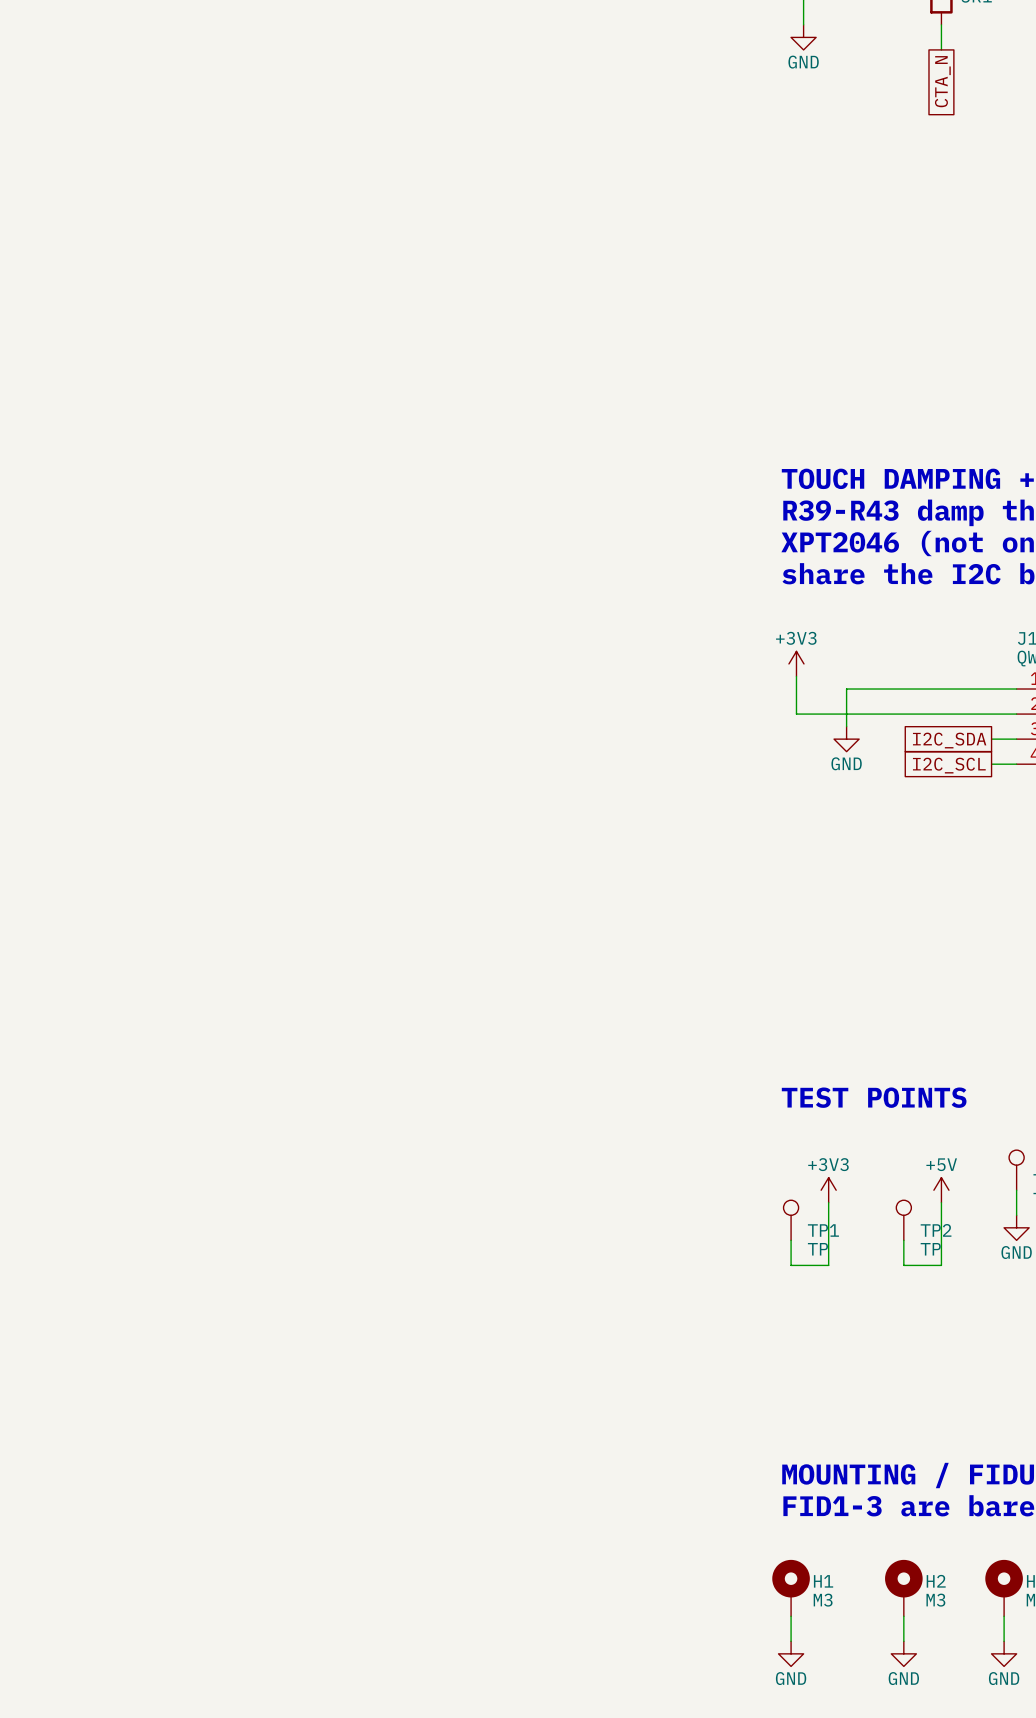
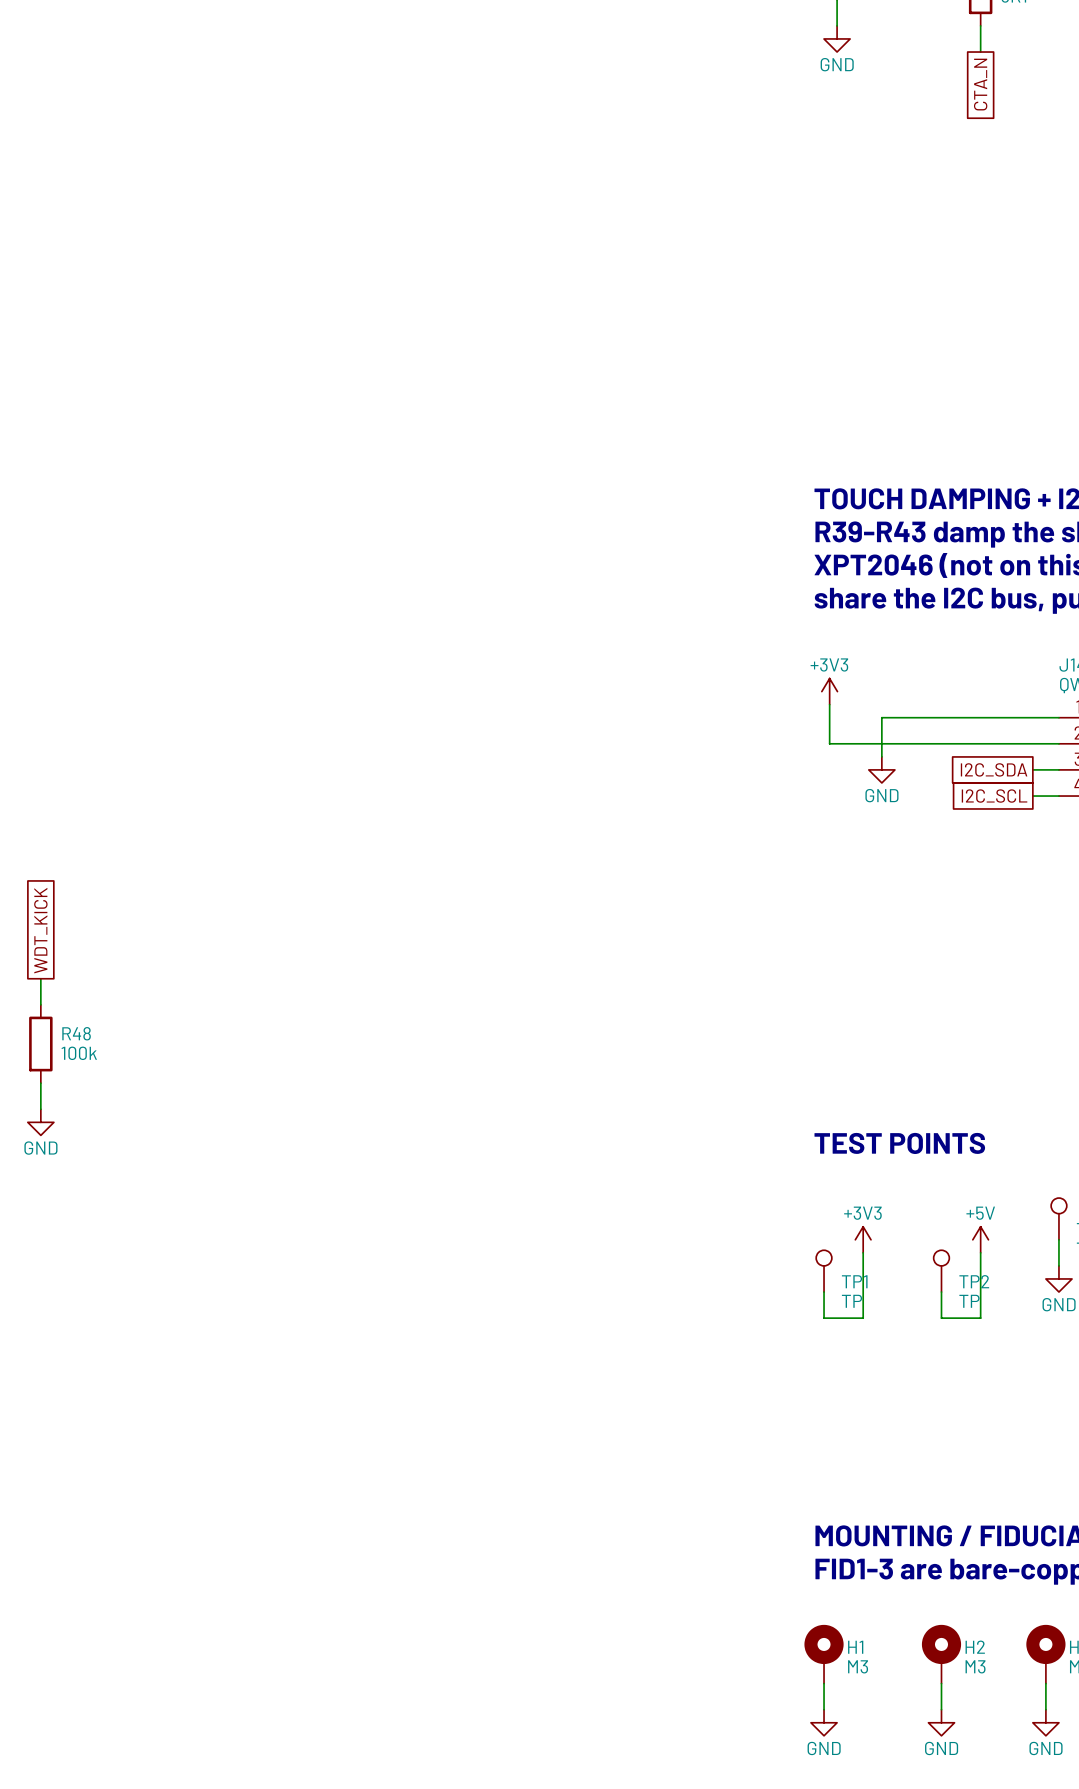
global label: none -> WDT_KICK (40, 930)
wire: none -> (40, 978) (40, 1004)
R48: none -> 100k (40, 1044)
wire: none -> (40, 1083) (40, 1109)
power symbol: none -> GND (40, 1122)

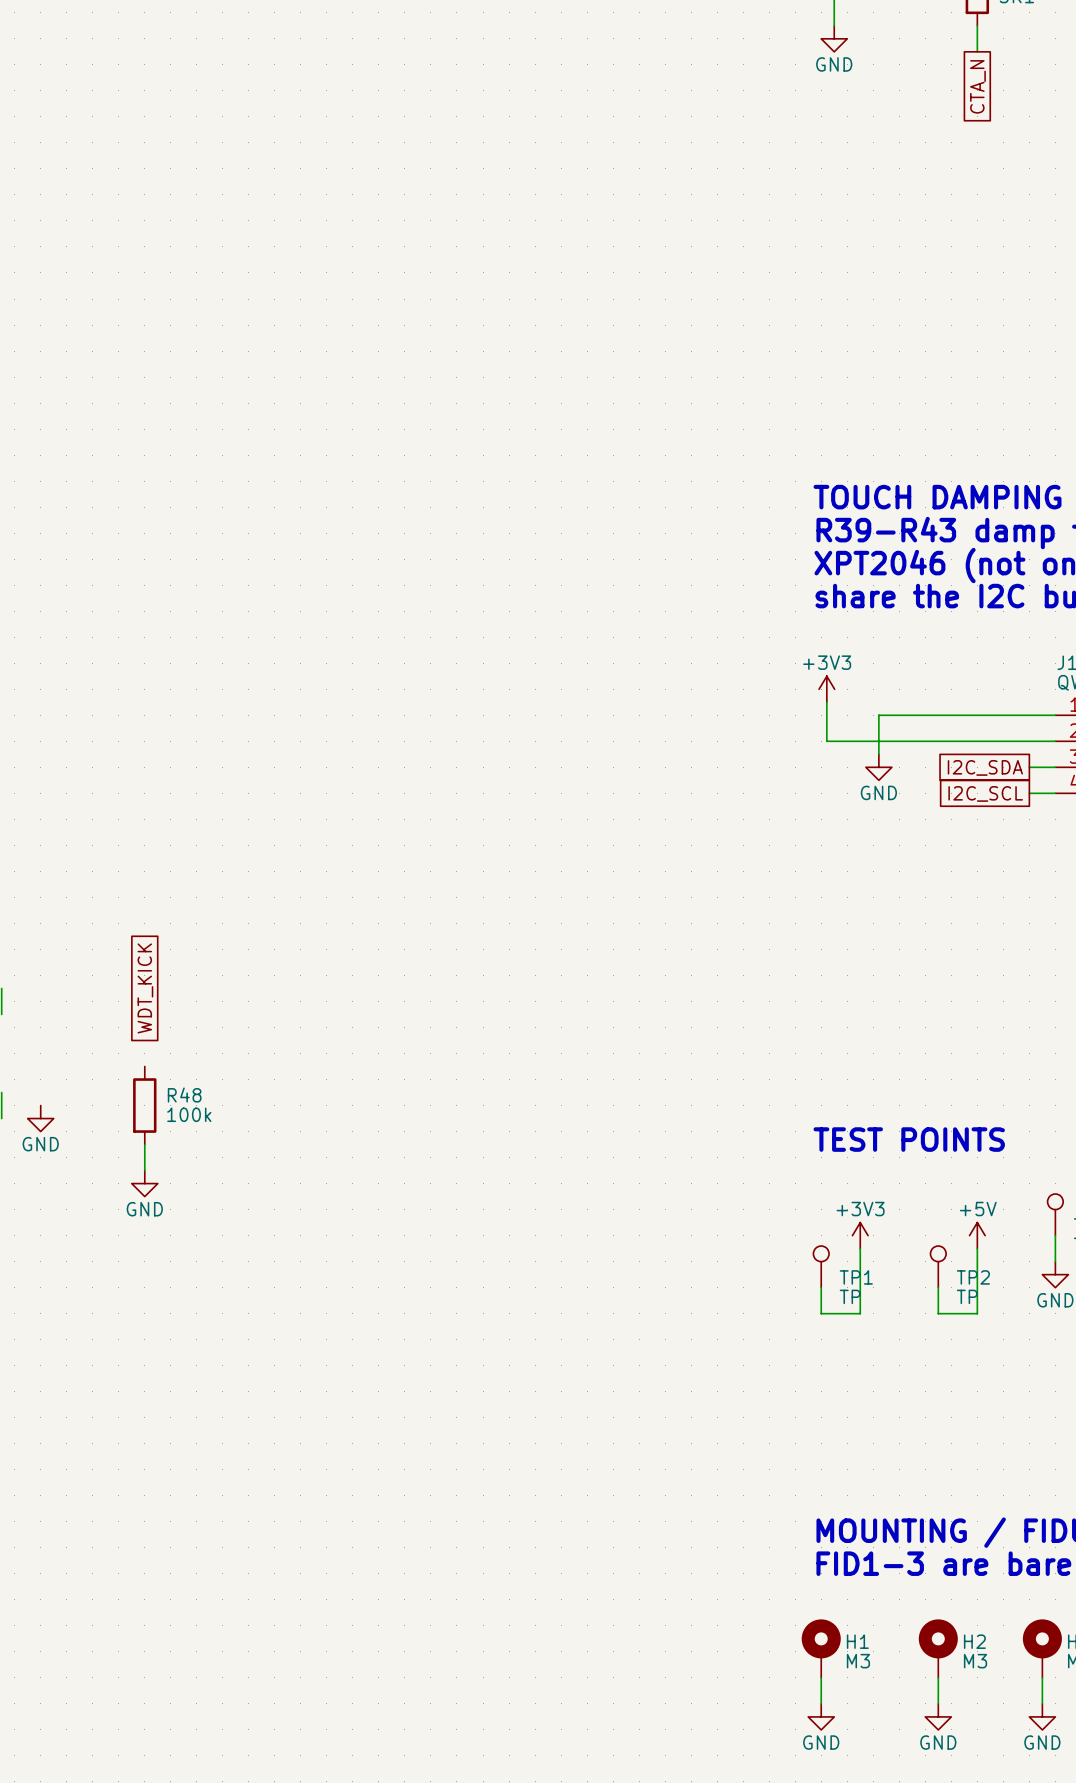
global label position: WDT_KICK (40, 930) -> WDT_KICK (145, 988)
wire: (40, 978) (40, 1004) -> (1, 988) (1, 1014)
R48 position: (40, 1044) -> (144, 1105)
wire: (40, 1083) (40, 1109) -> (1, 1092) (1, 1118)
wire: none -> (144, 1144) (144, 1170)
power symbol: none -> GND (144, 1183)

